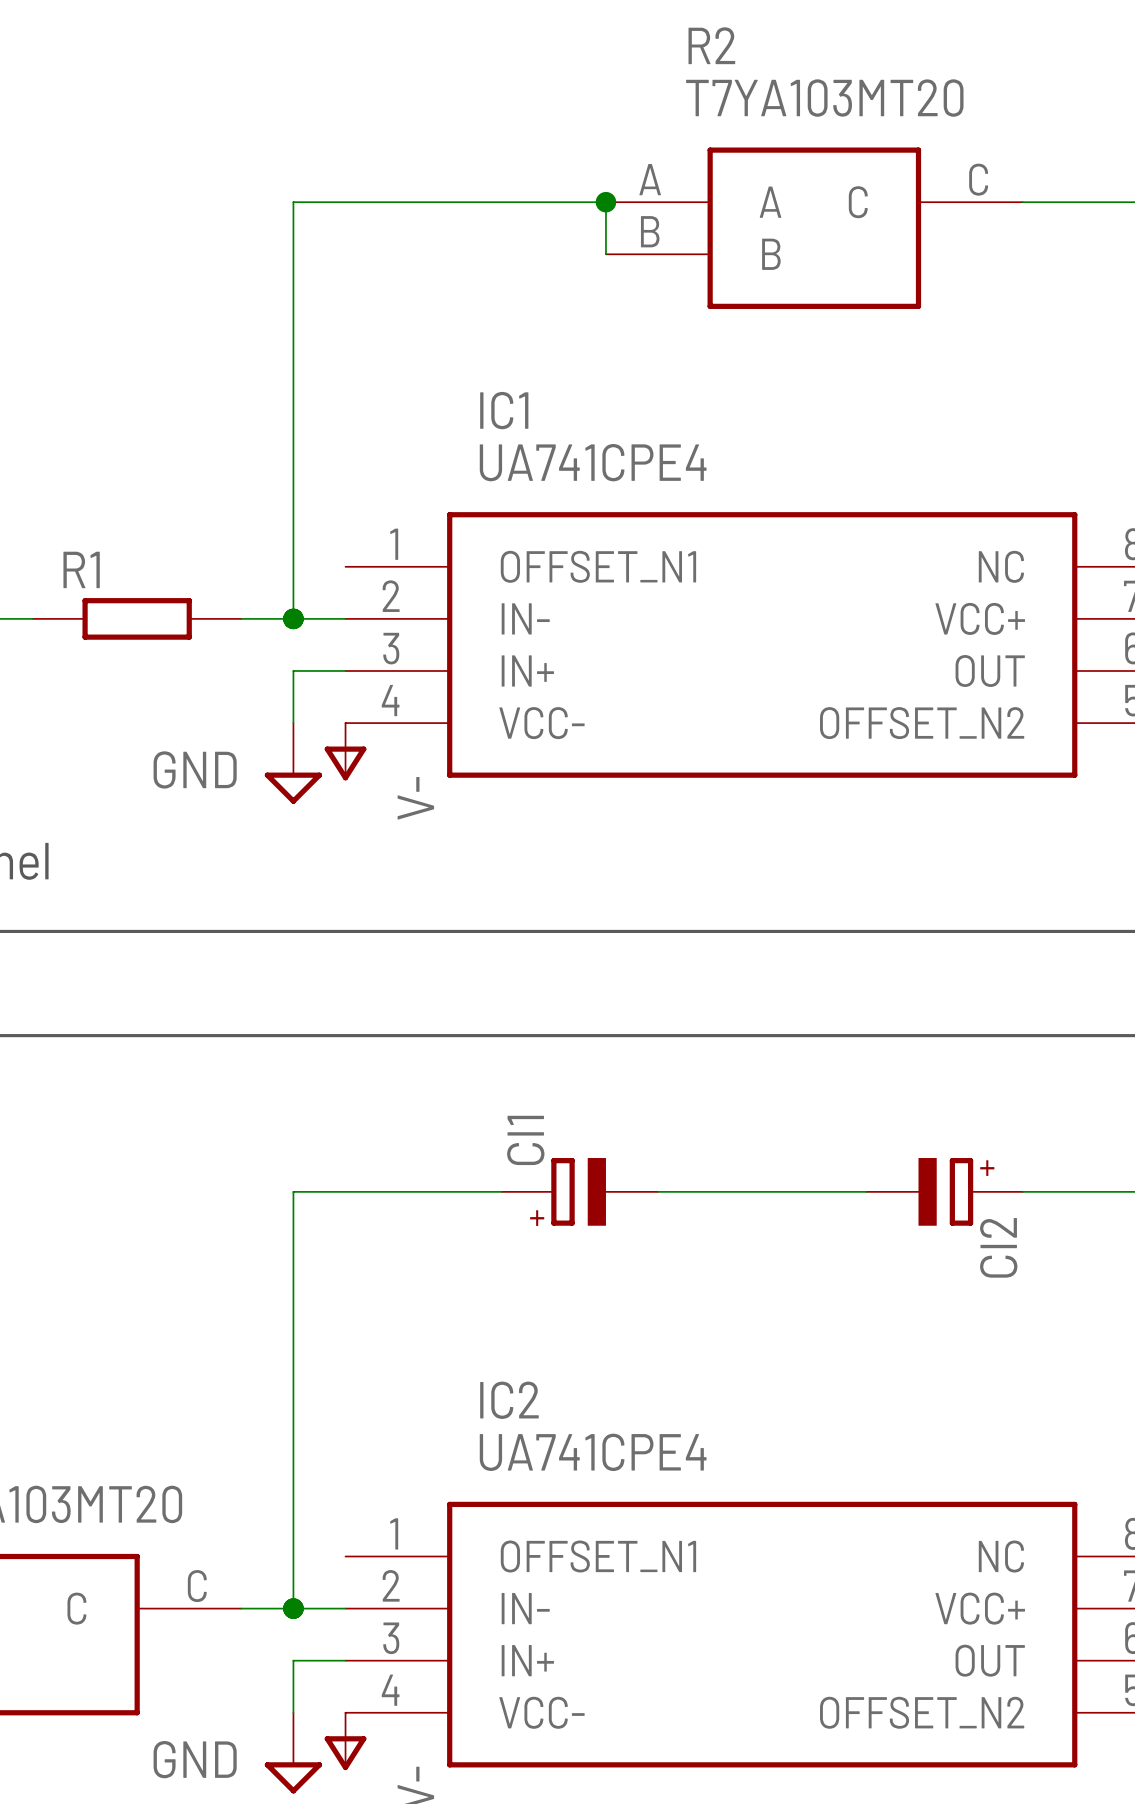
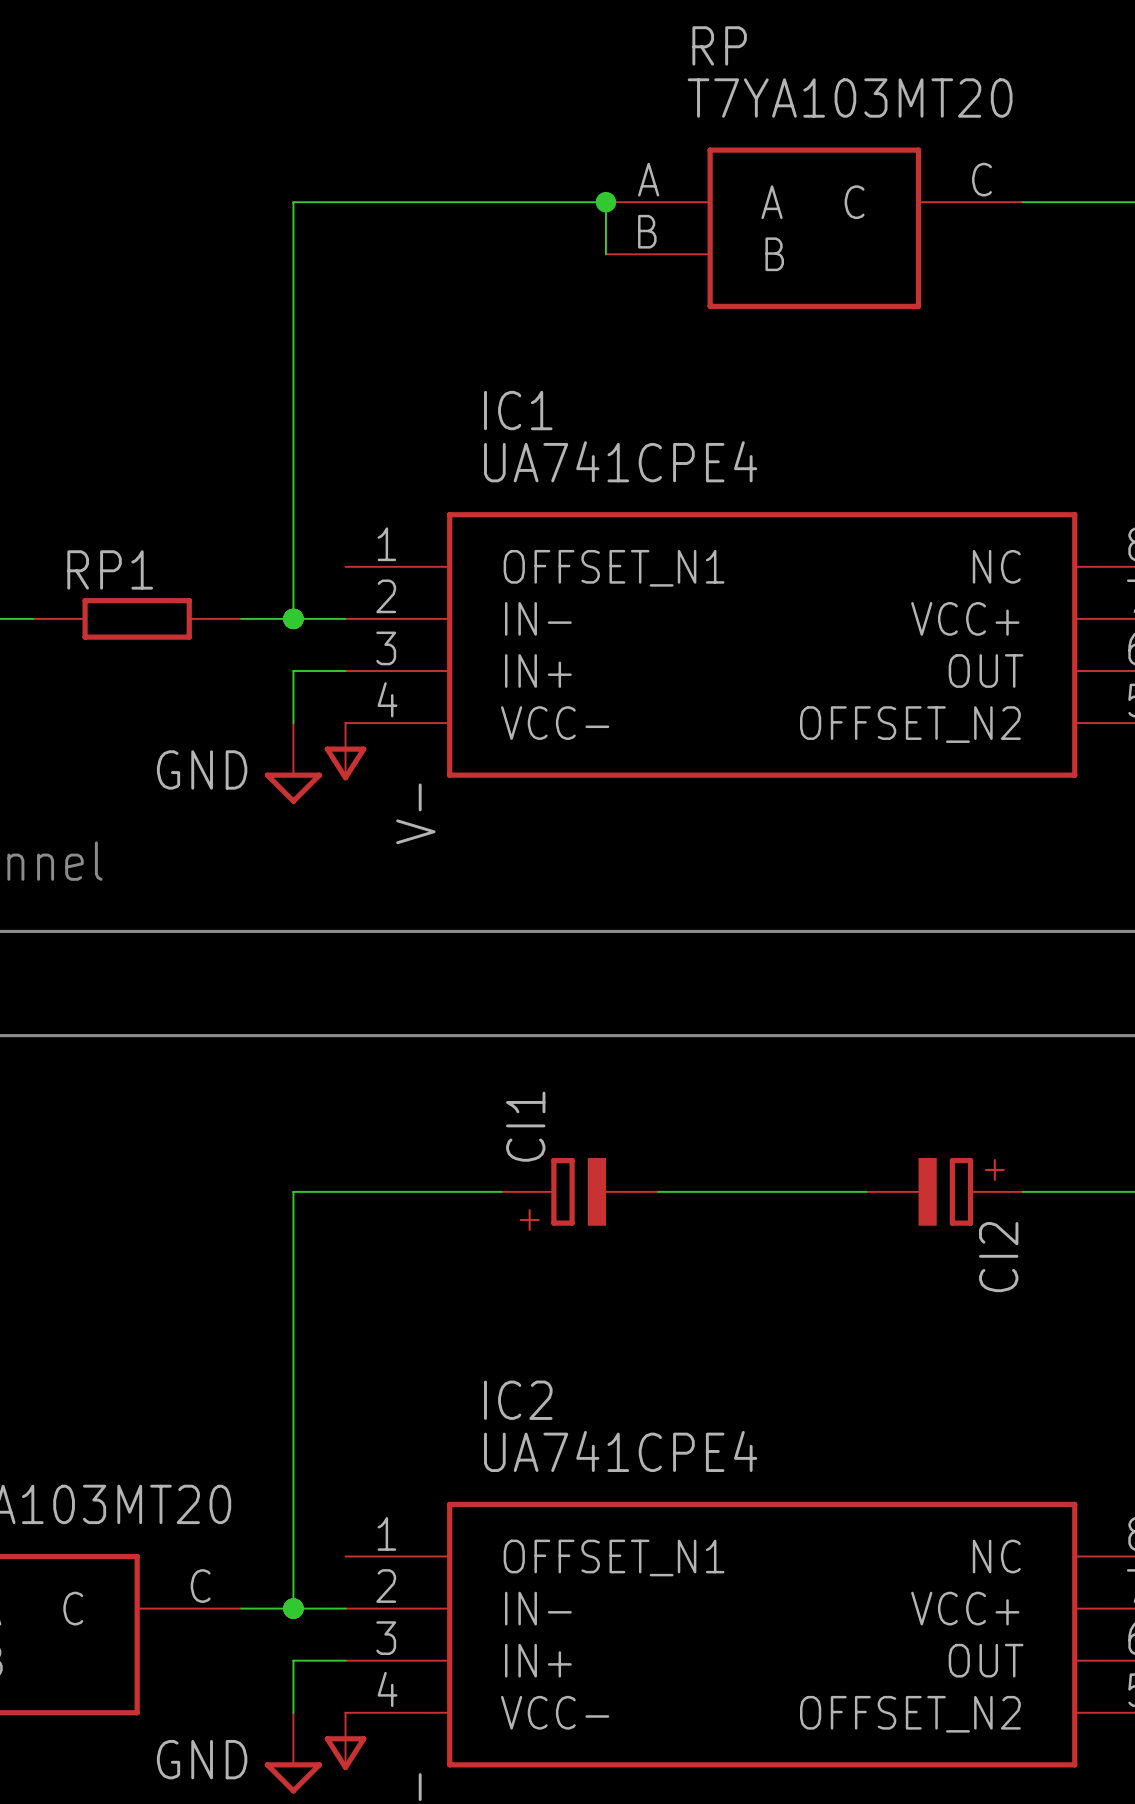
R2 name: R2 (711, 45) -> RP (719, 45)
R1 name: R1 (81, 569) -> RP1 (110, 569)

